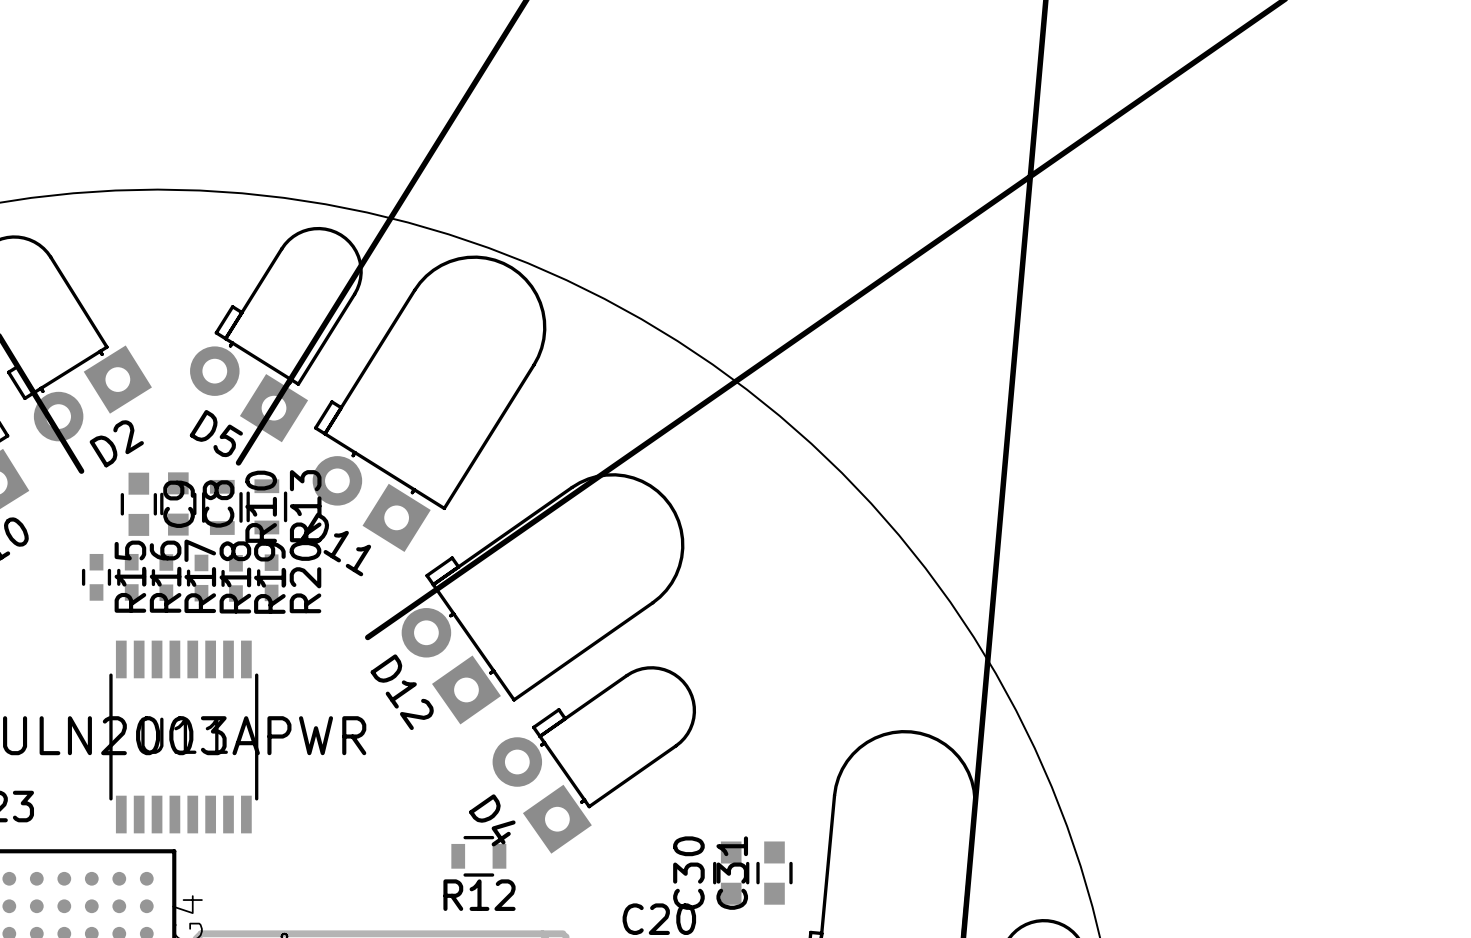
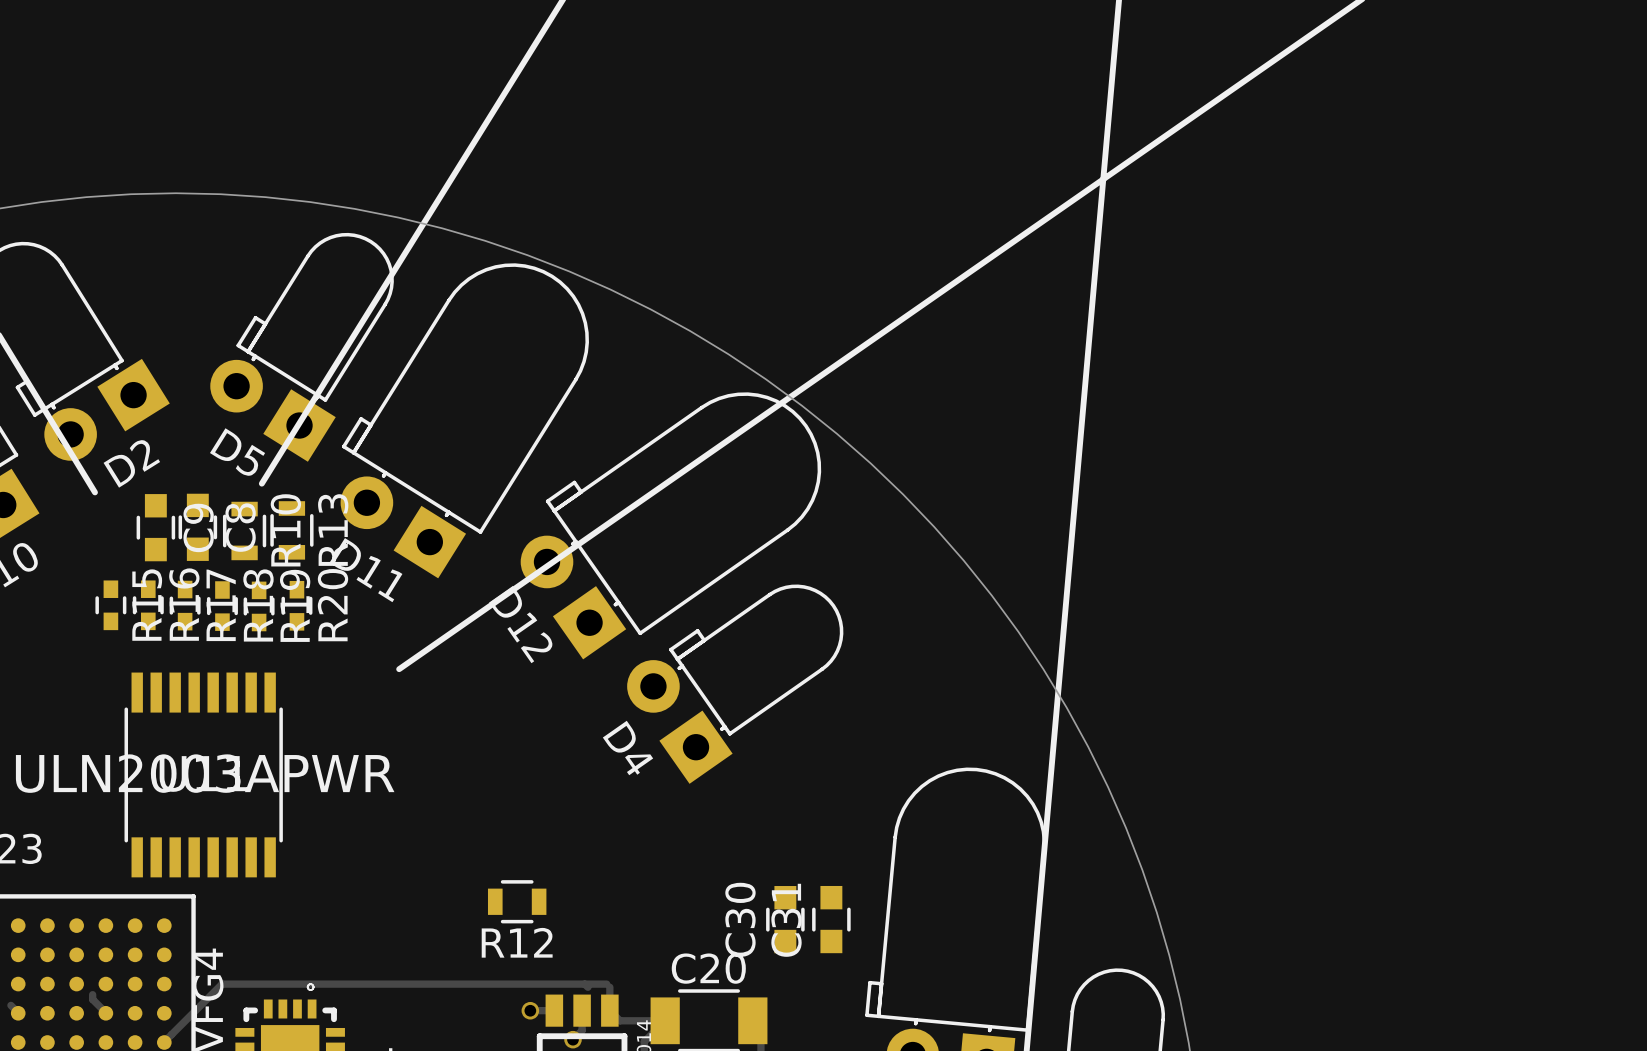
D12 position: (543, 598) -> (670, 525)
D4 position: (594, 759) -> (735, 684)

